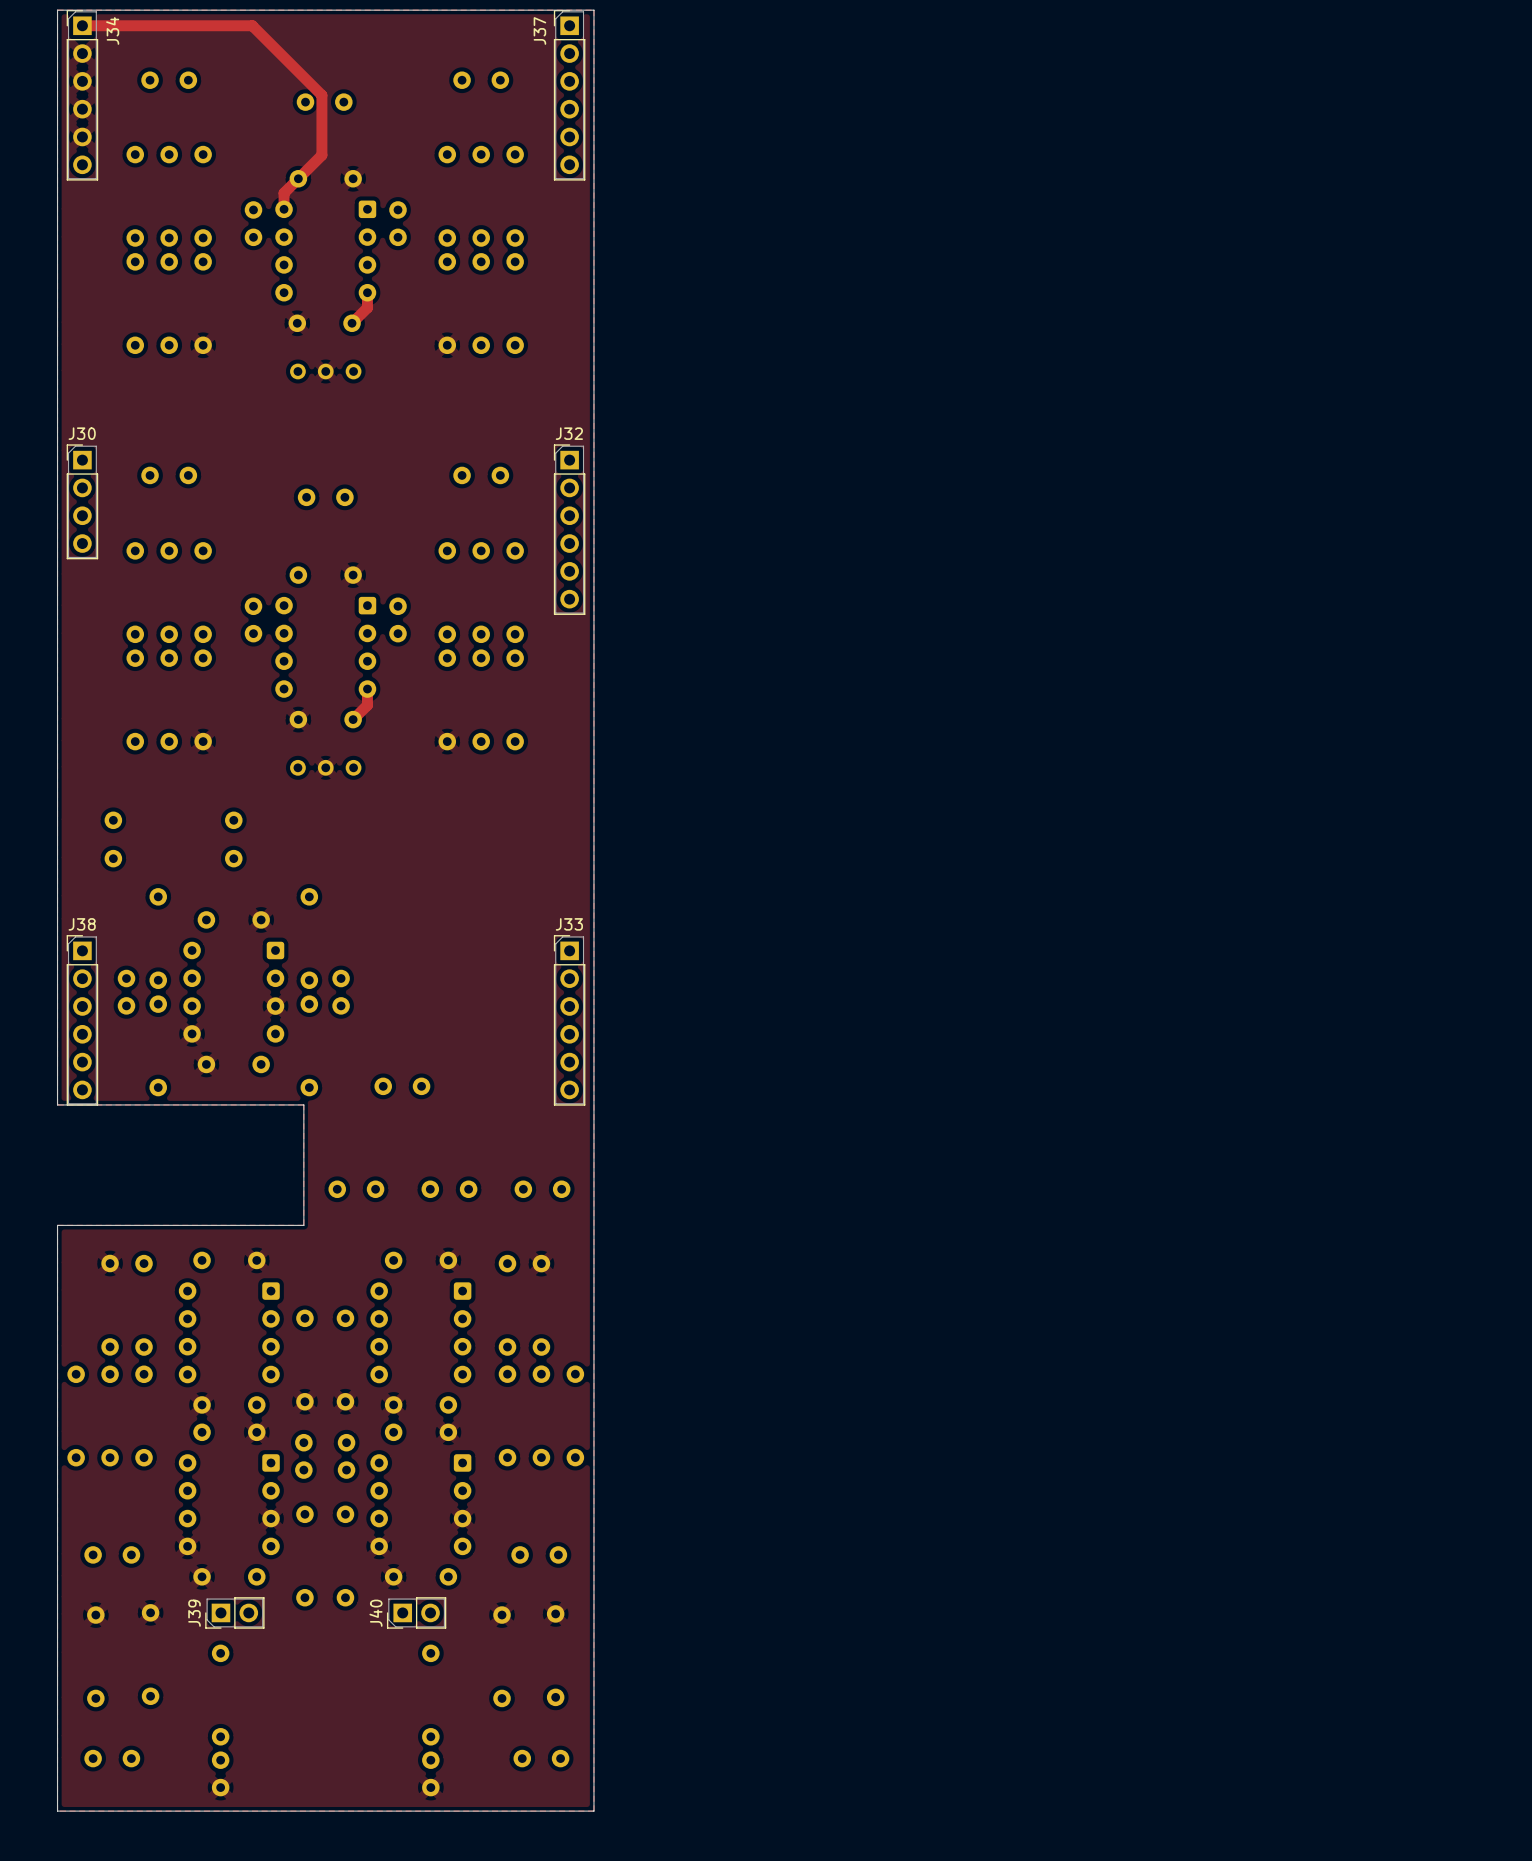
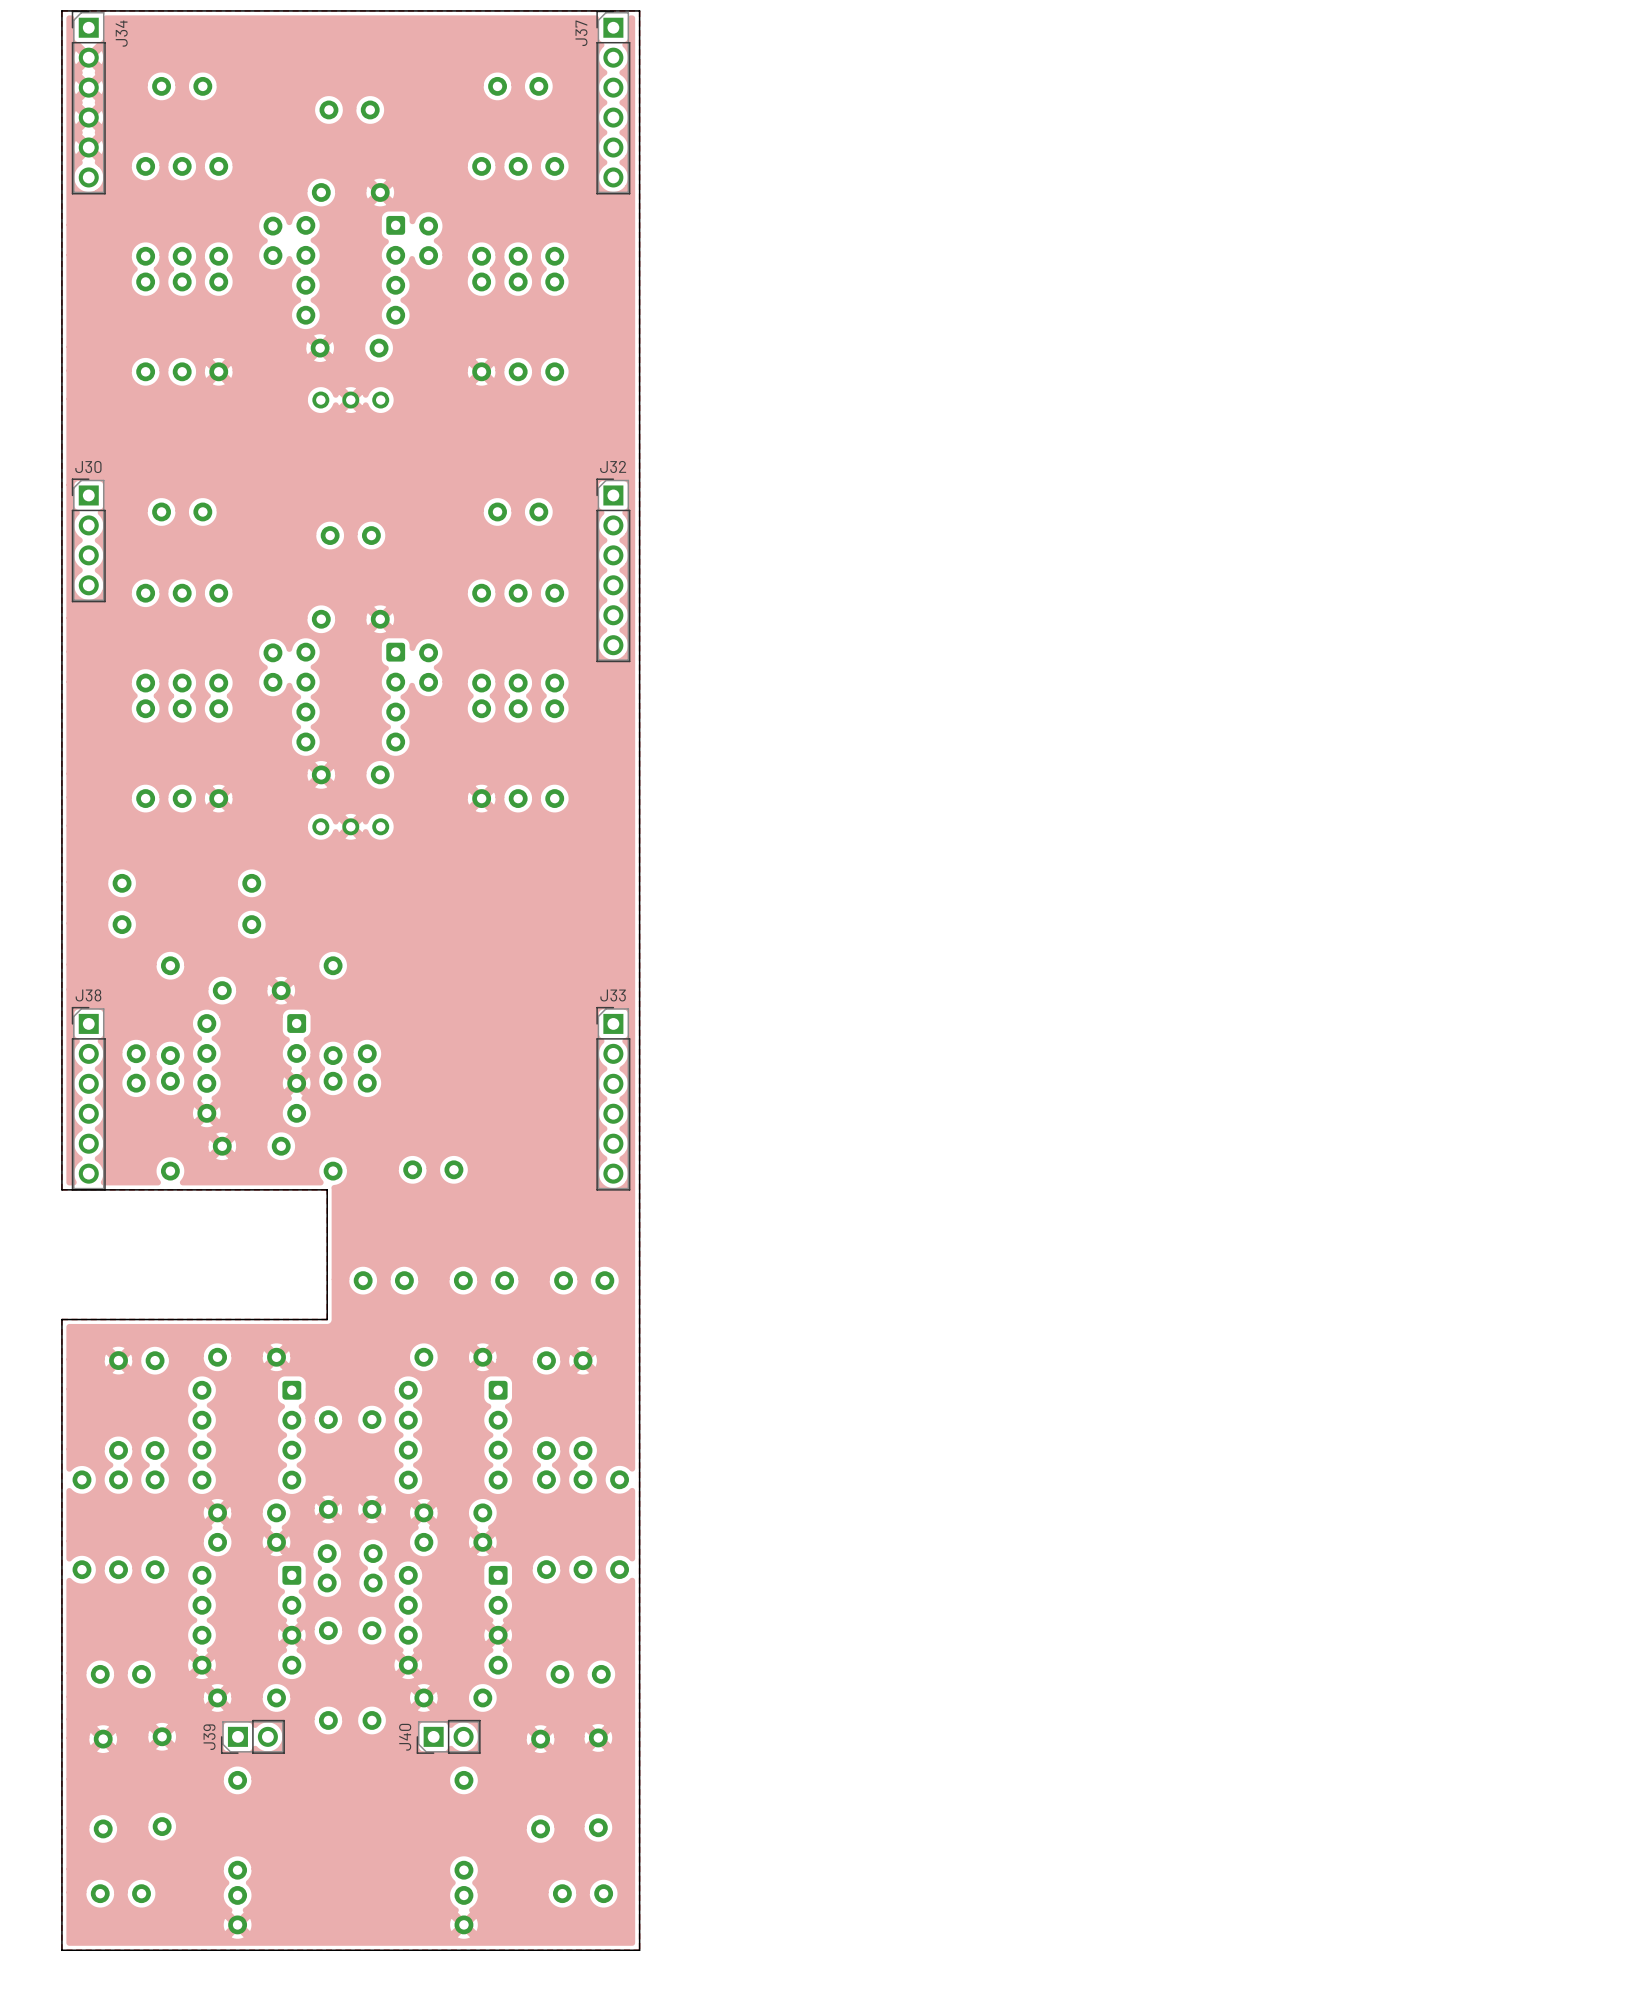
track: (82, 25) (252, 25) (321, 95) (321, 155) (284, 193) (284, 209) -> none
track: (367, 292) (367, 307) (352, 323) -> none
track: (367, 689) (367, 705) (353, 719) -> none

